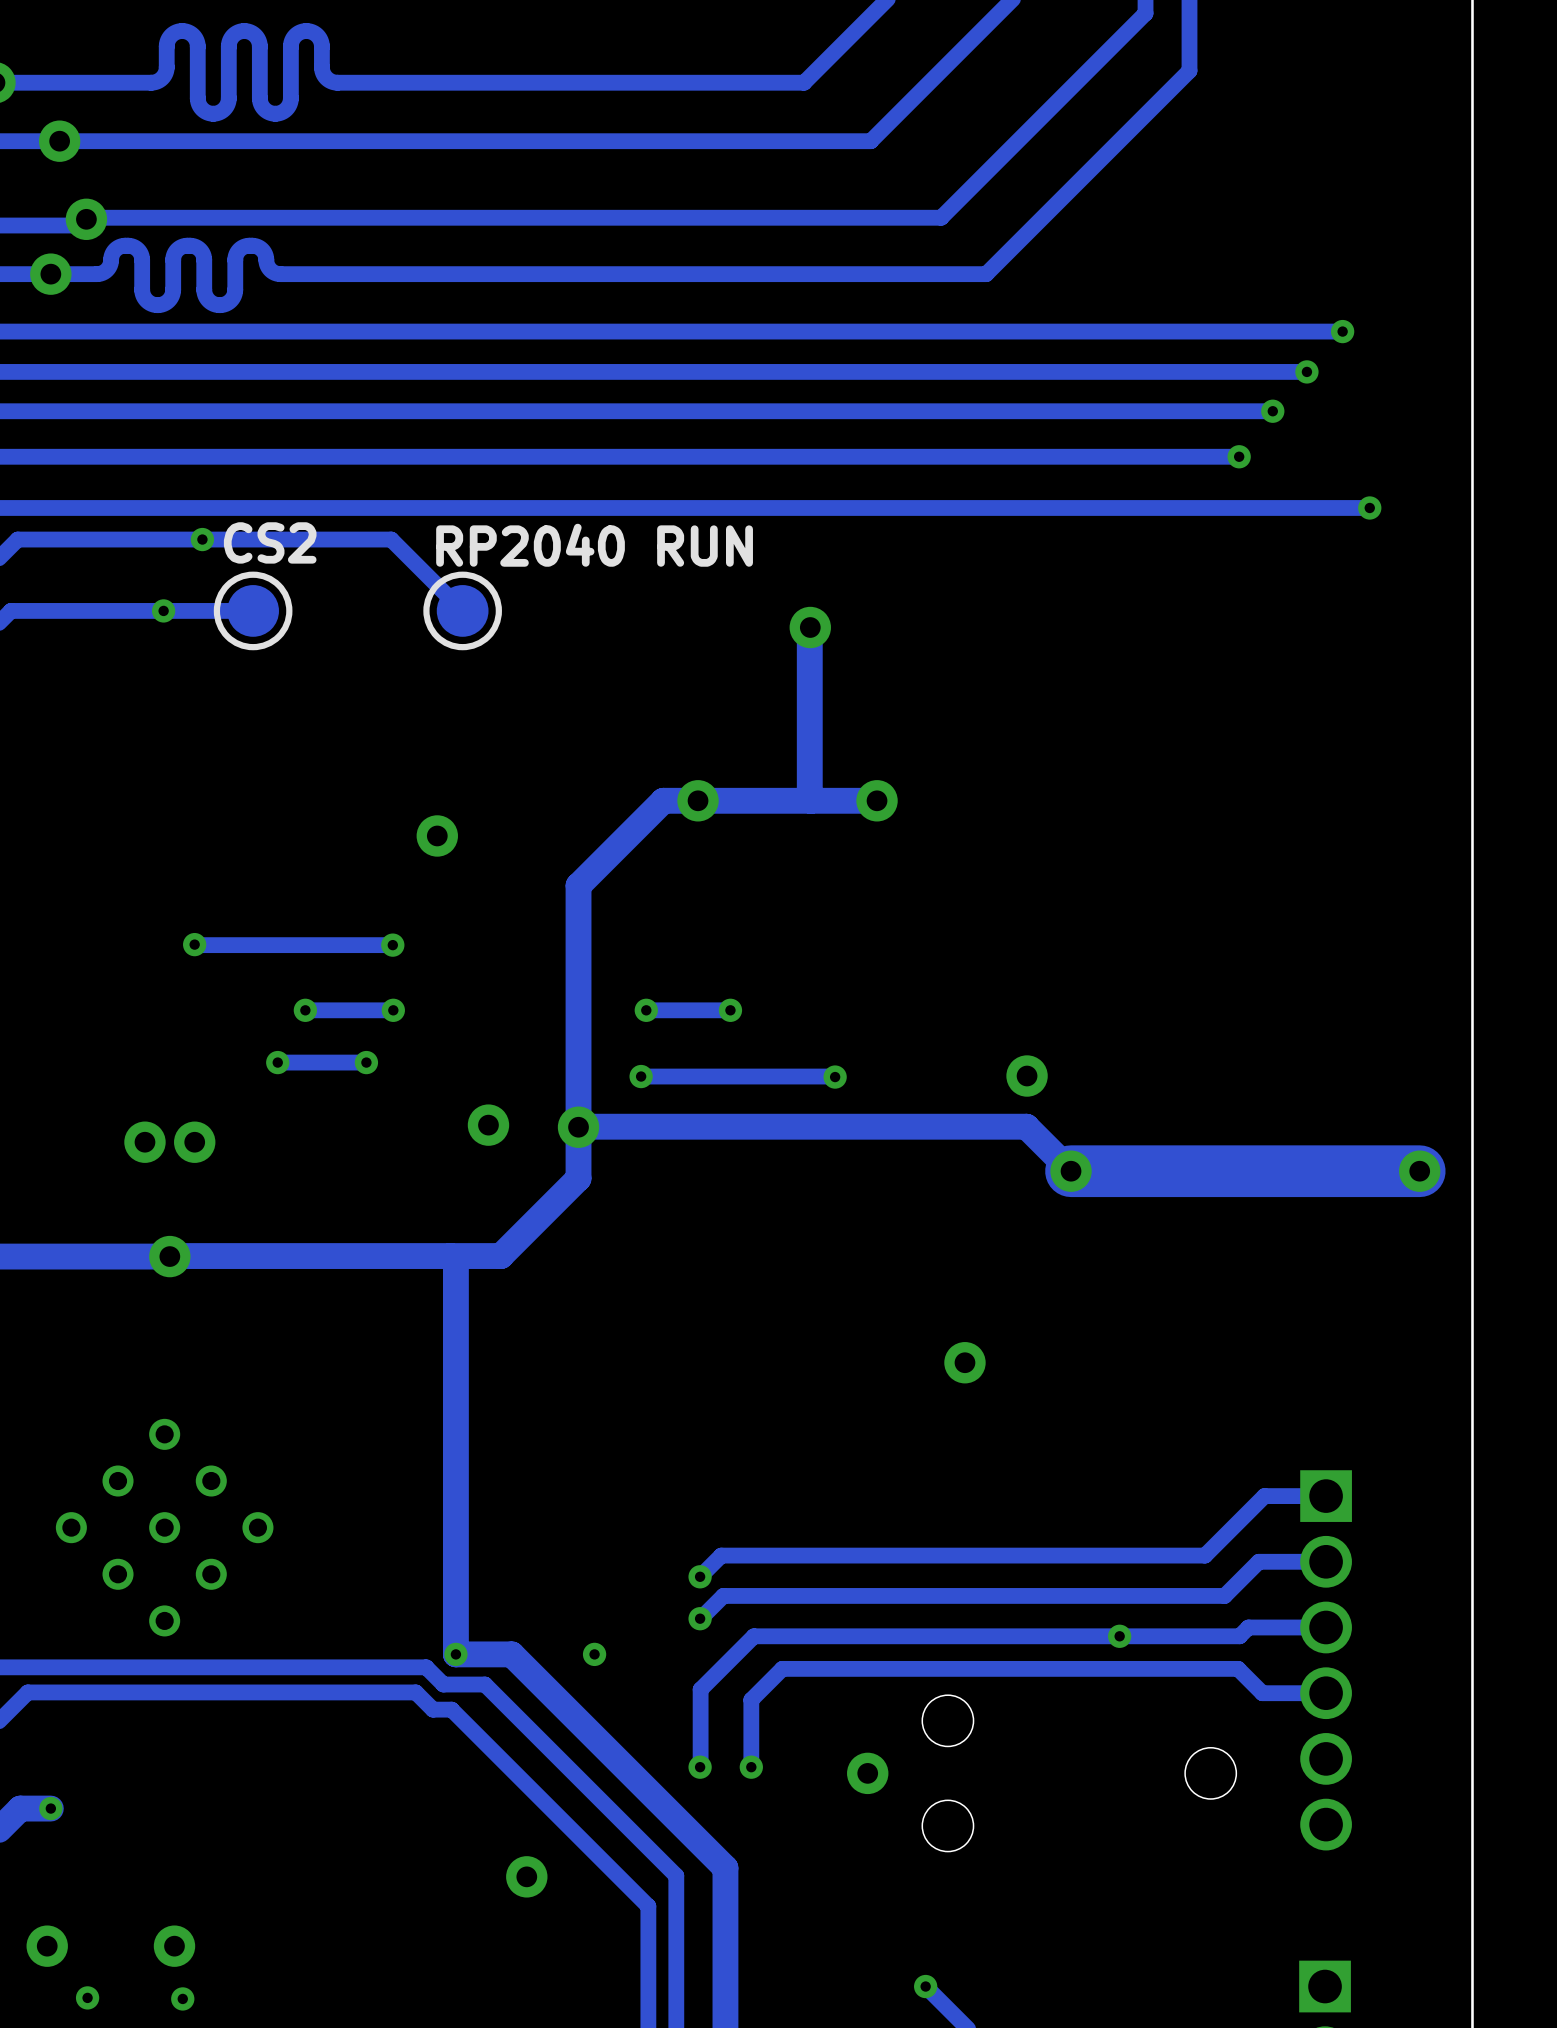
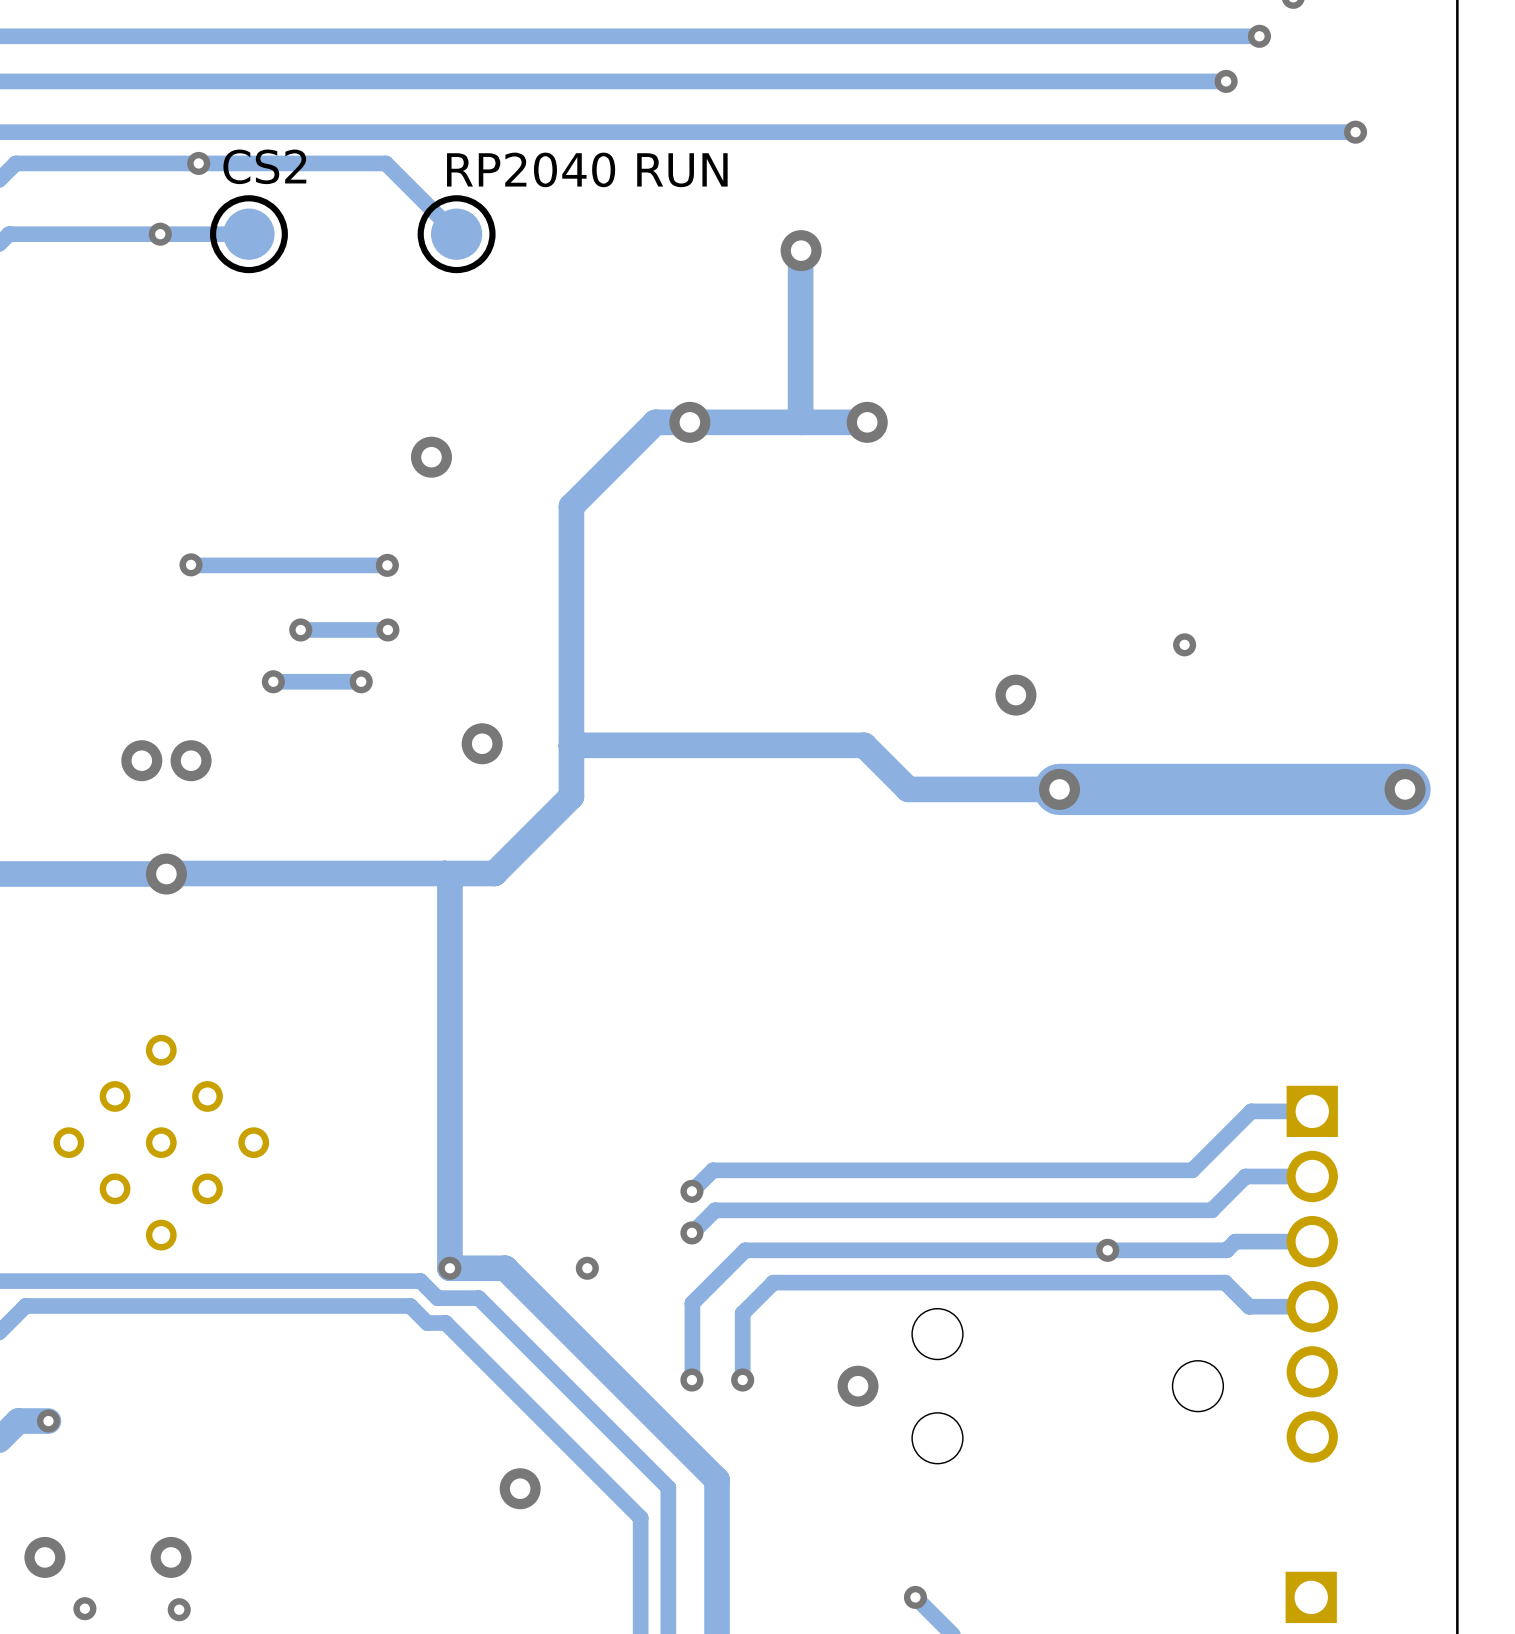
via: (646, 1010) -> none
track: (730, 1010) (646, 1010) -> none
via: (730, 1010) -> none
via: none -> (1184, 644)
via: (641, 1076) -> none
track: (834, 1076) (641, 1076) -> none
via: (835, 1077) -> none
track: (873, 1126) (1026, 1126) (1071, 1171) -> (864, 745) (908, 789) (1059, 789)
via: (578, 1127) -> none
via: (964, 1362) -> none

